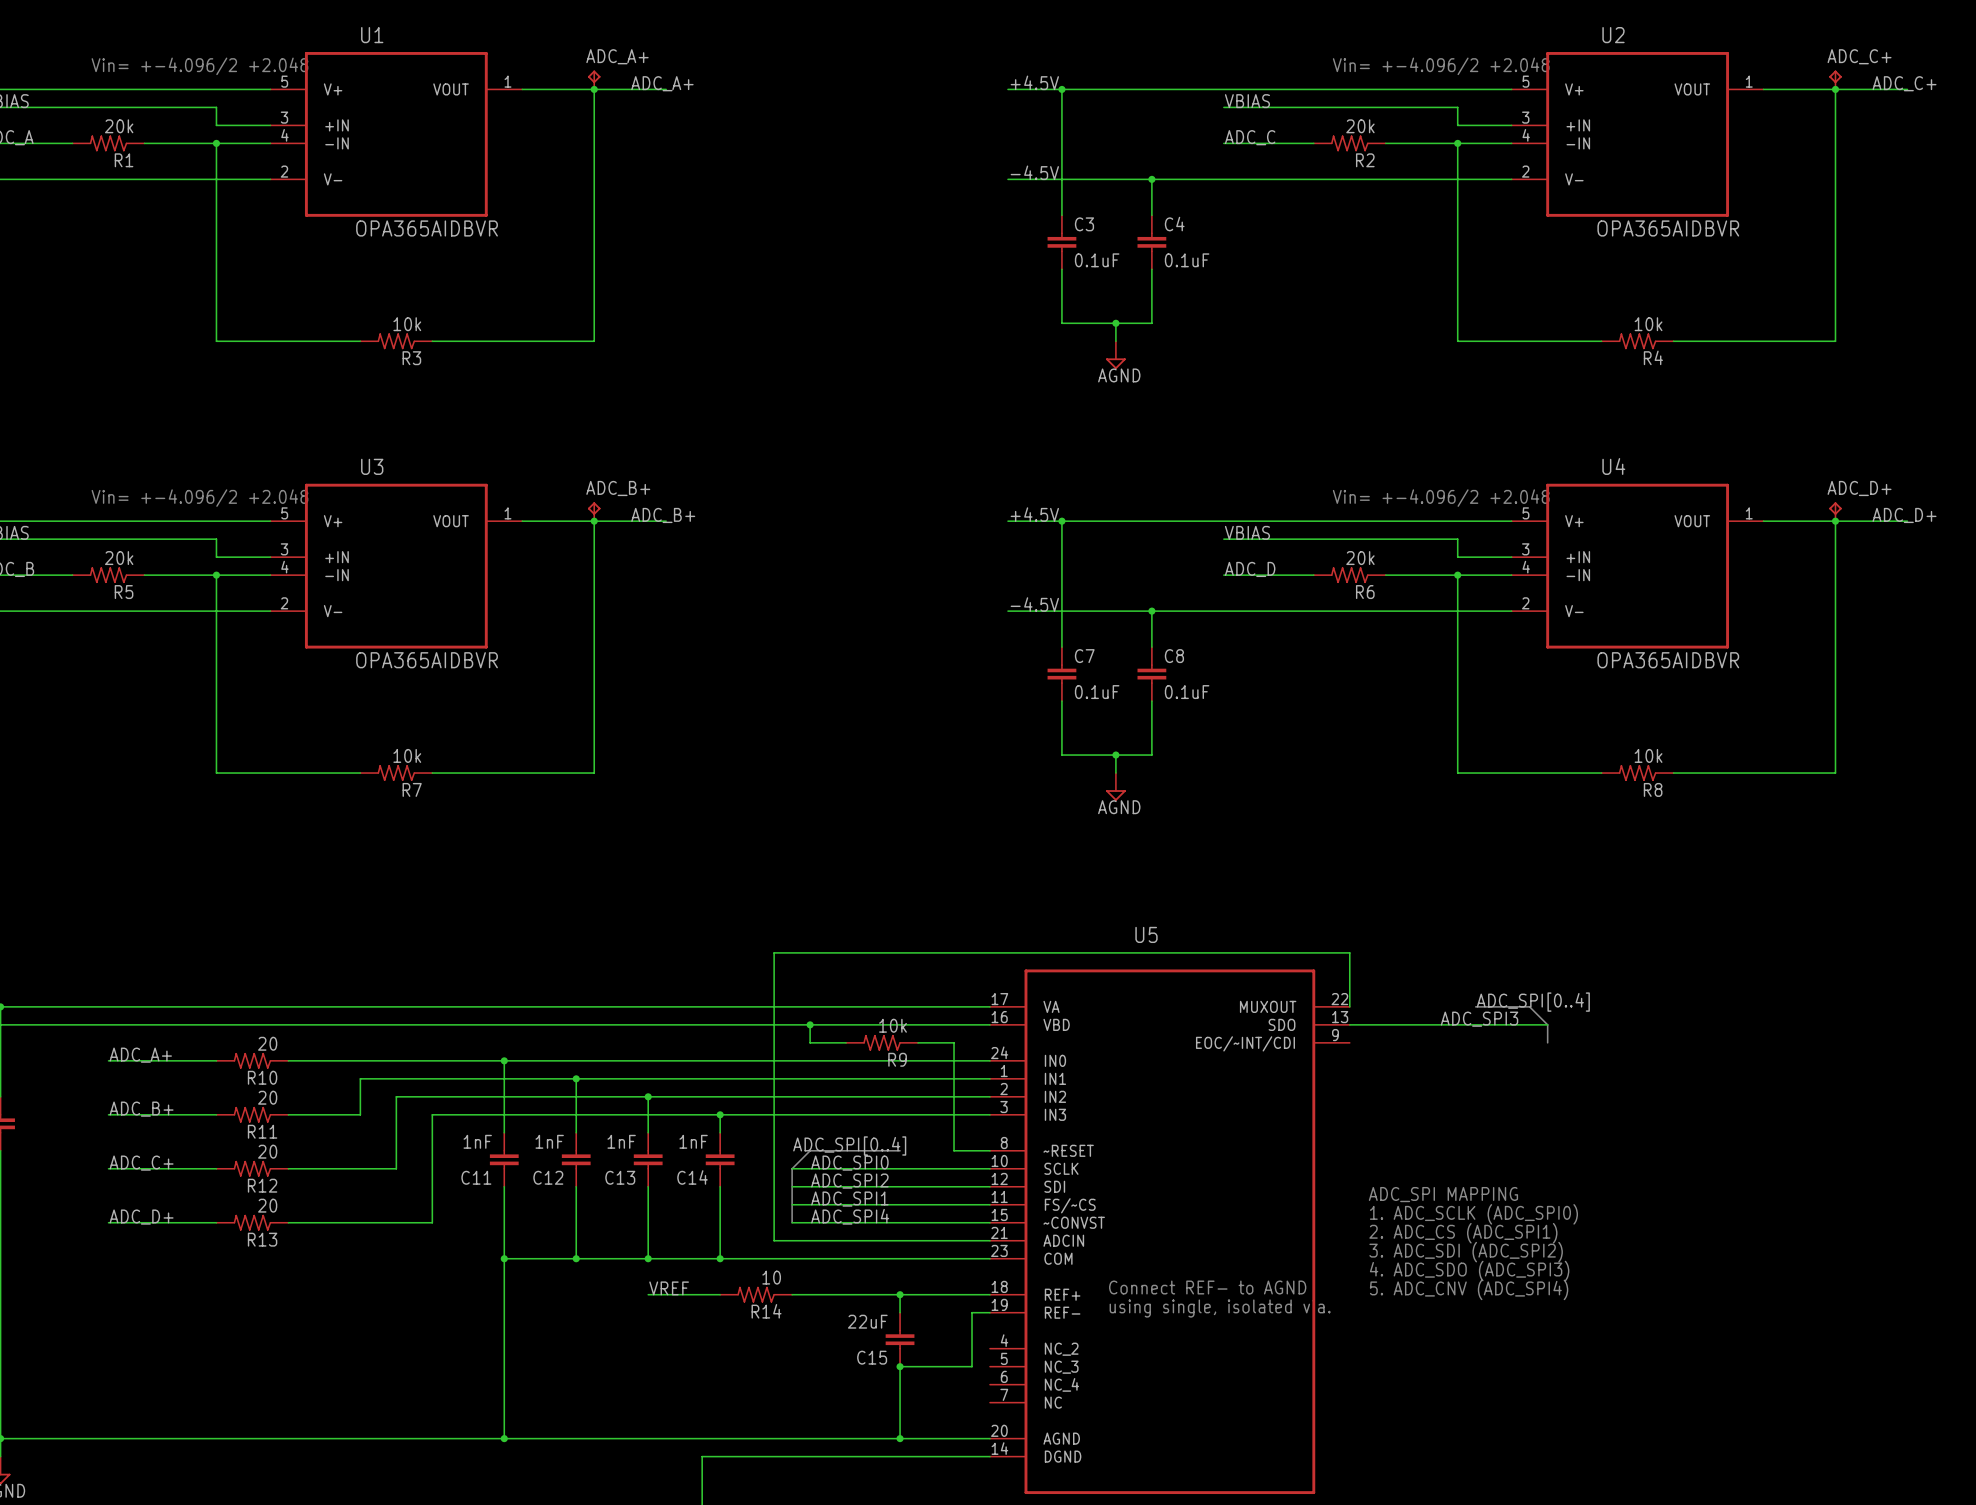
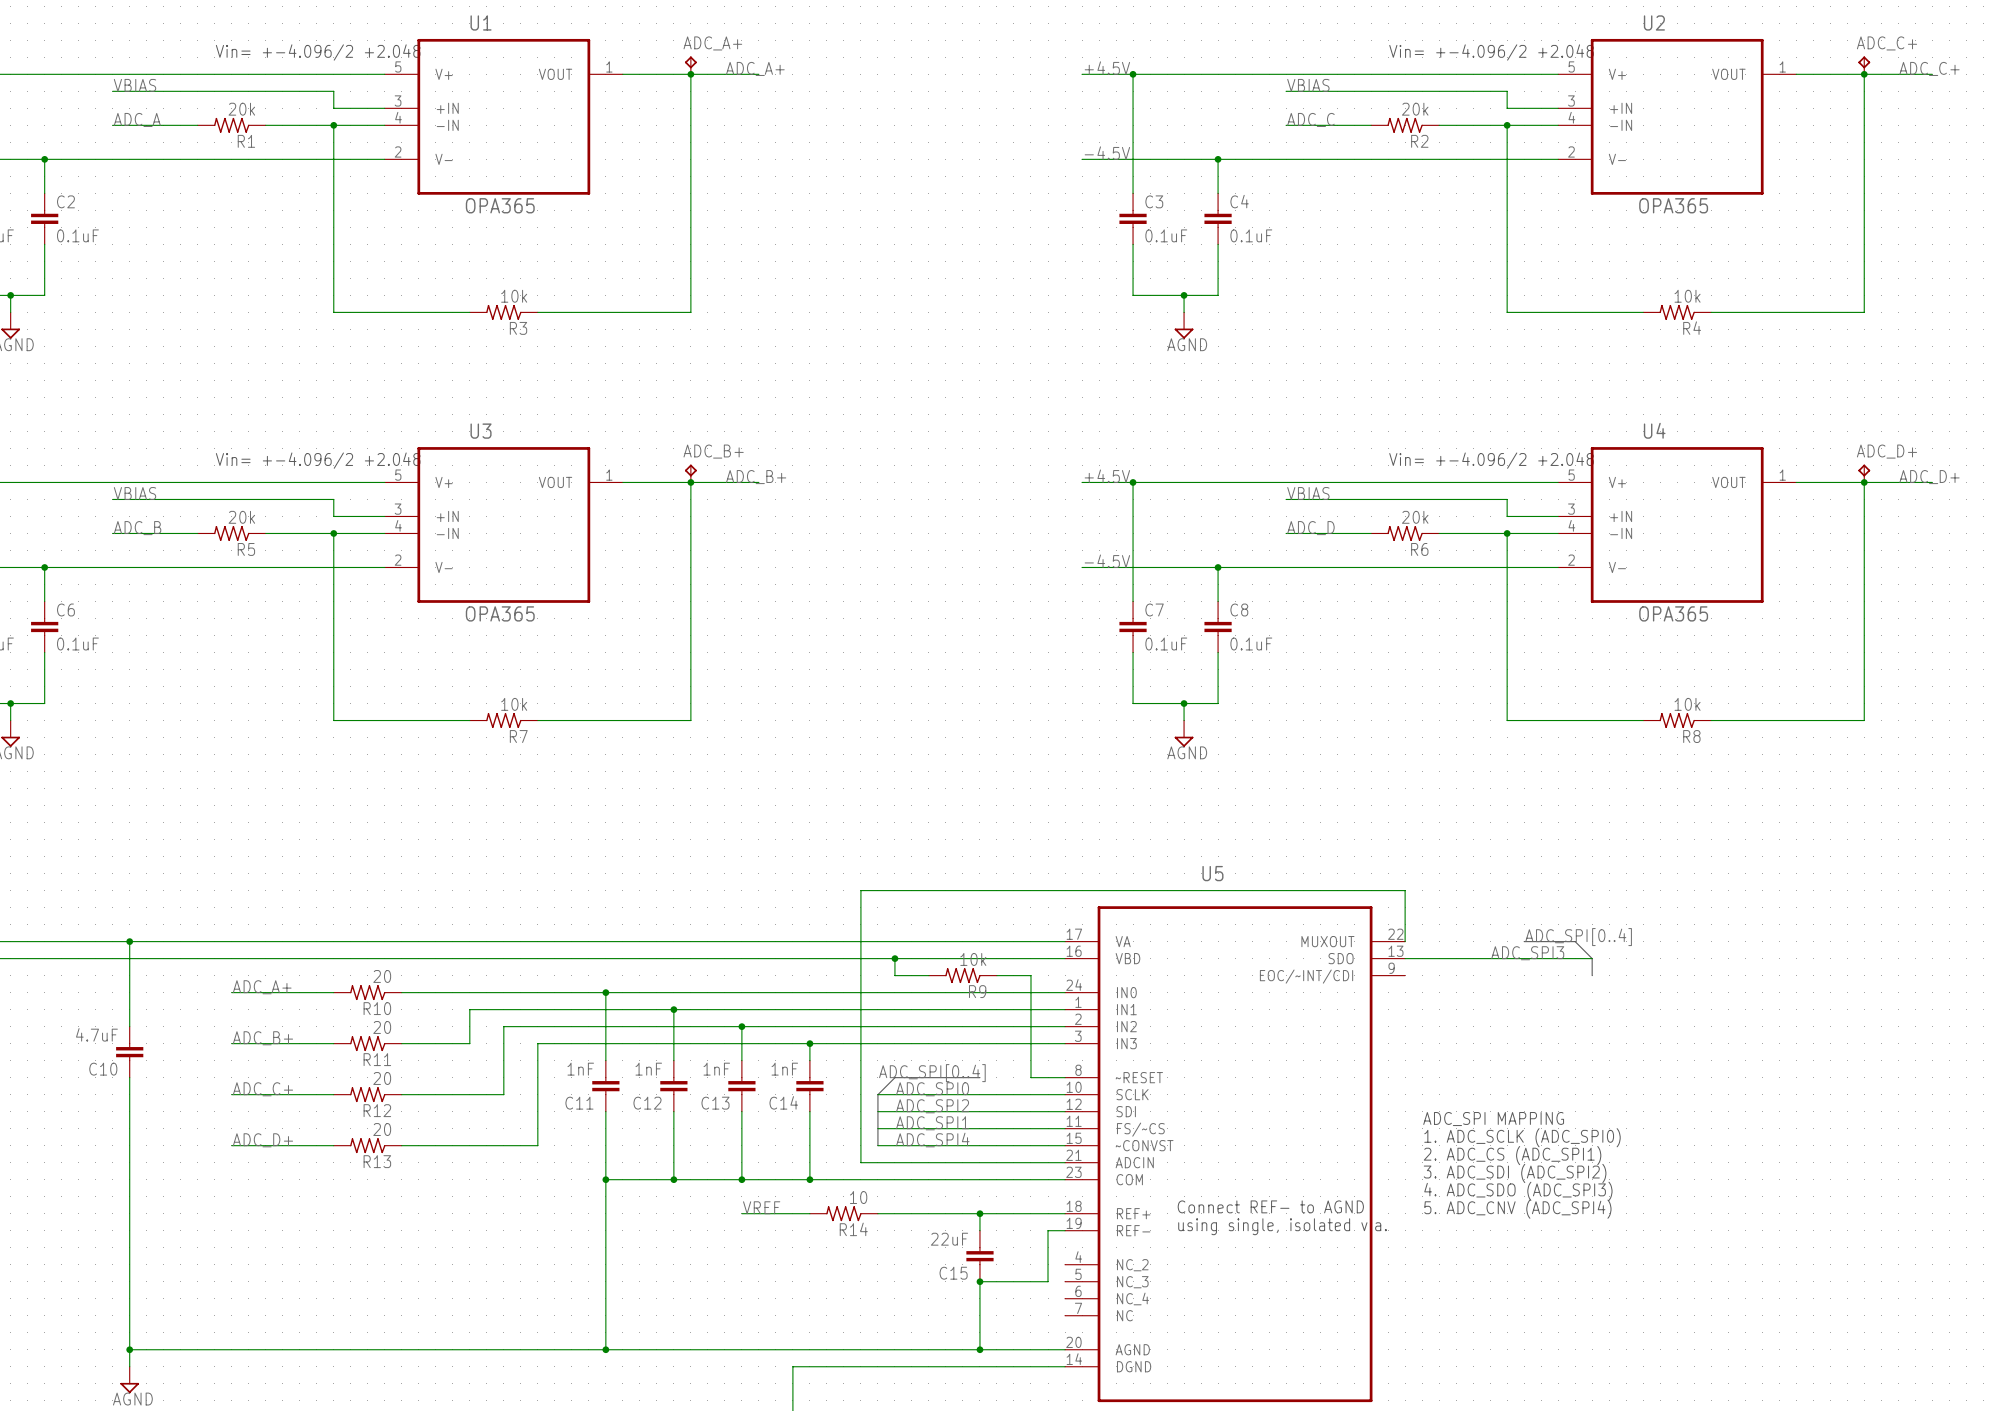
U1 value: OPA365AIDBVR (427, 228) -> OPA365 (500, 205)
U2 value: OPA365AIDBVR (1668, 228) -> OPA365 (1673, 205)
U3 value: OPA365AIDBVR (427, 660) -> OPA365 (500, 613)
U4 value: OPA365AIDBVR (1668, 660) -> OPA365 (1673, 613)

